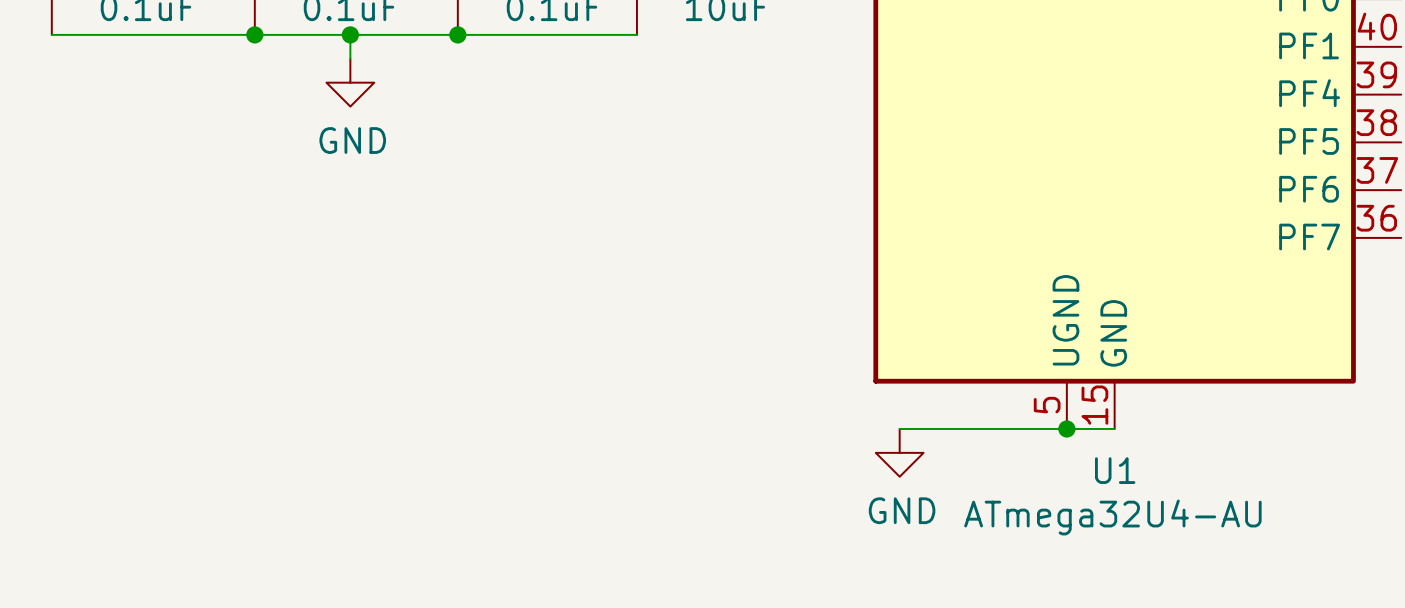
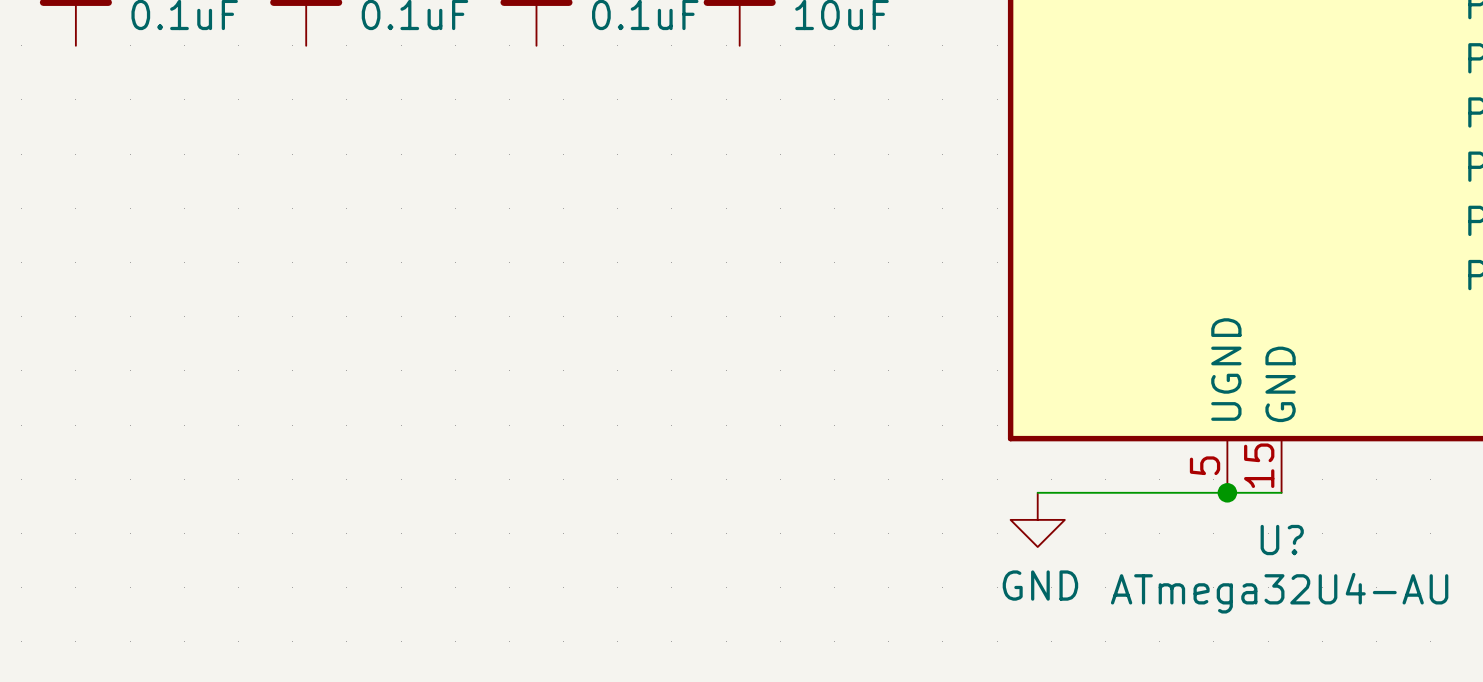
wire: (51, 34) (636, 34) -> none
junction: (254, 34) -> none
wire: (350, 34) (350, 58) -> none
junction: (350, 34) -> none
junction: (457, 34) -> none
power symbol: GND (350, 82) -> none
U1 name: U1 (1115, 470) -> U? (1282, 540)

